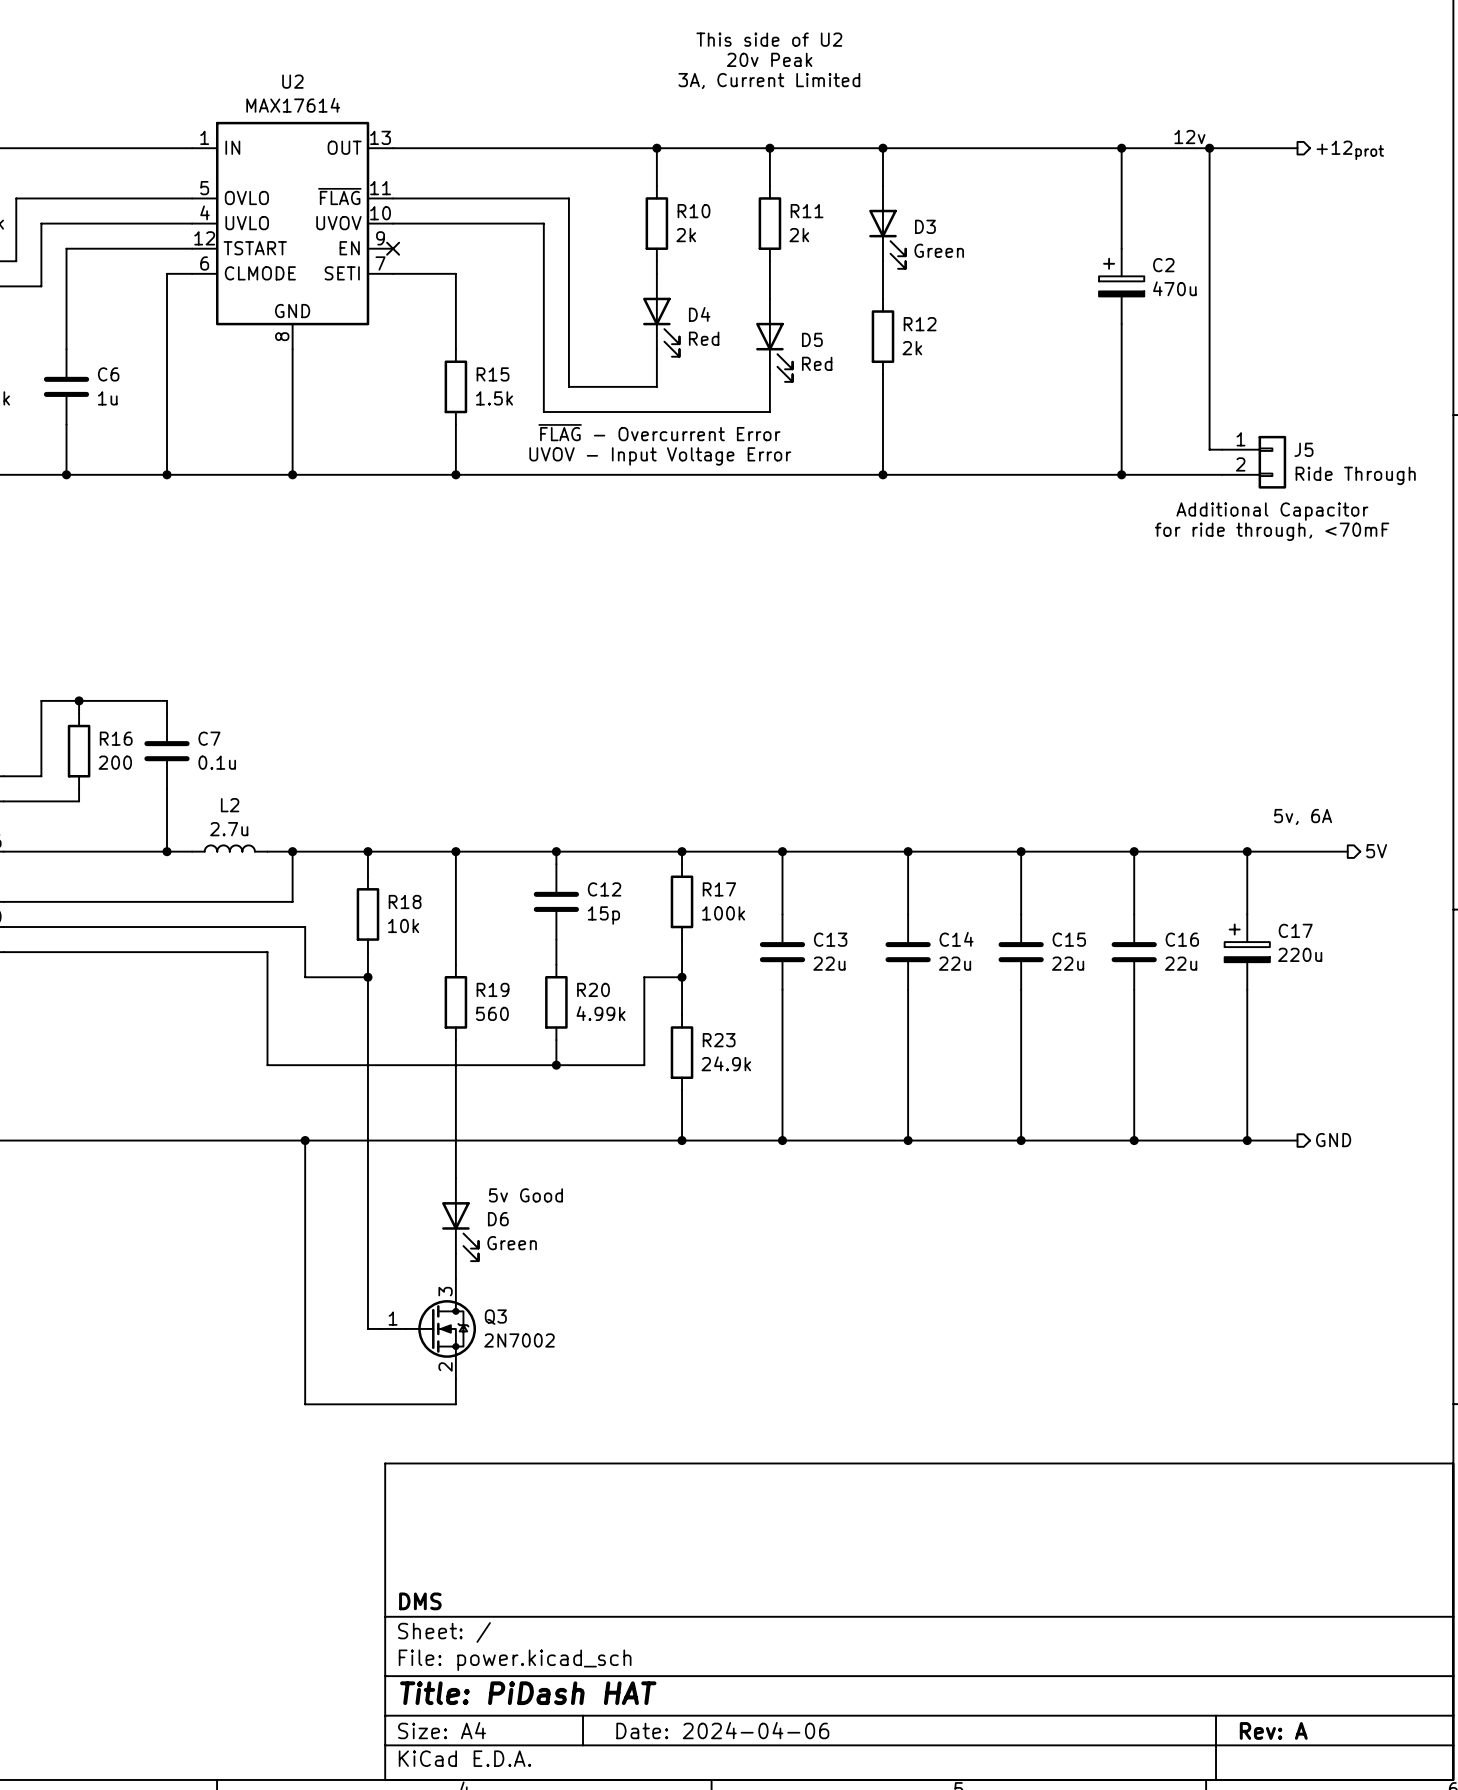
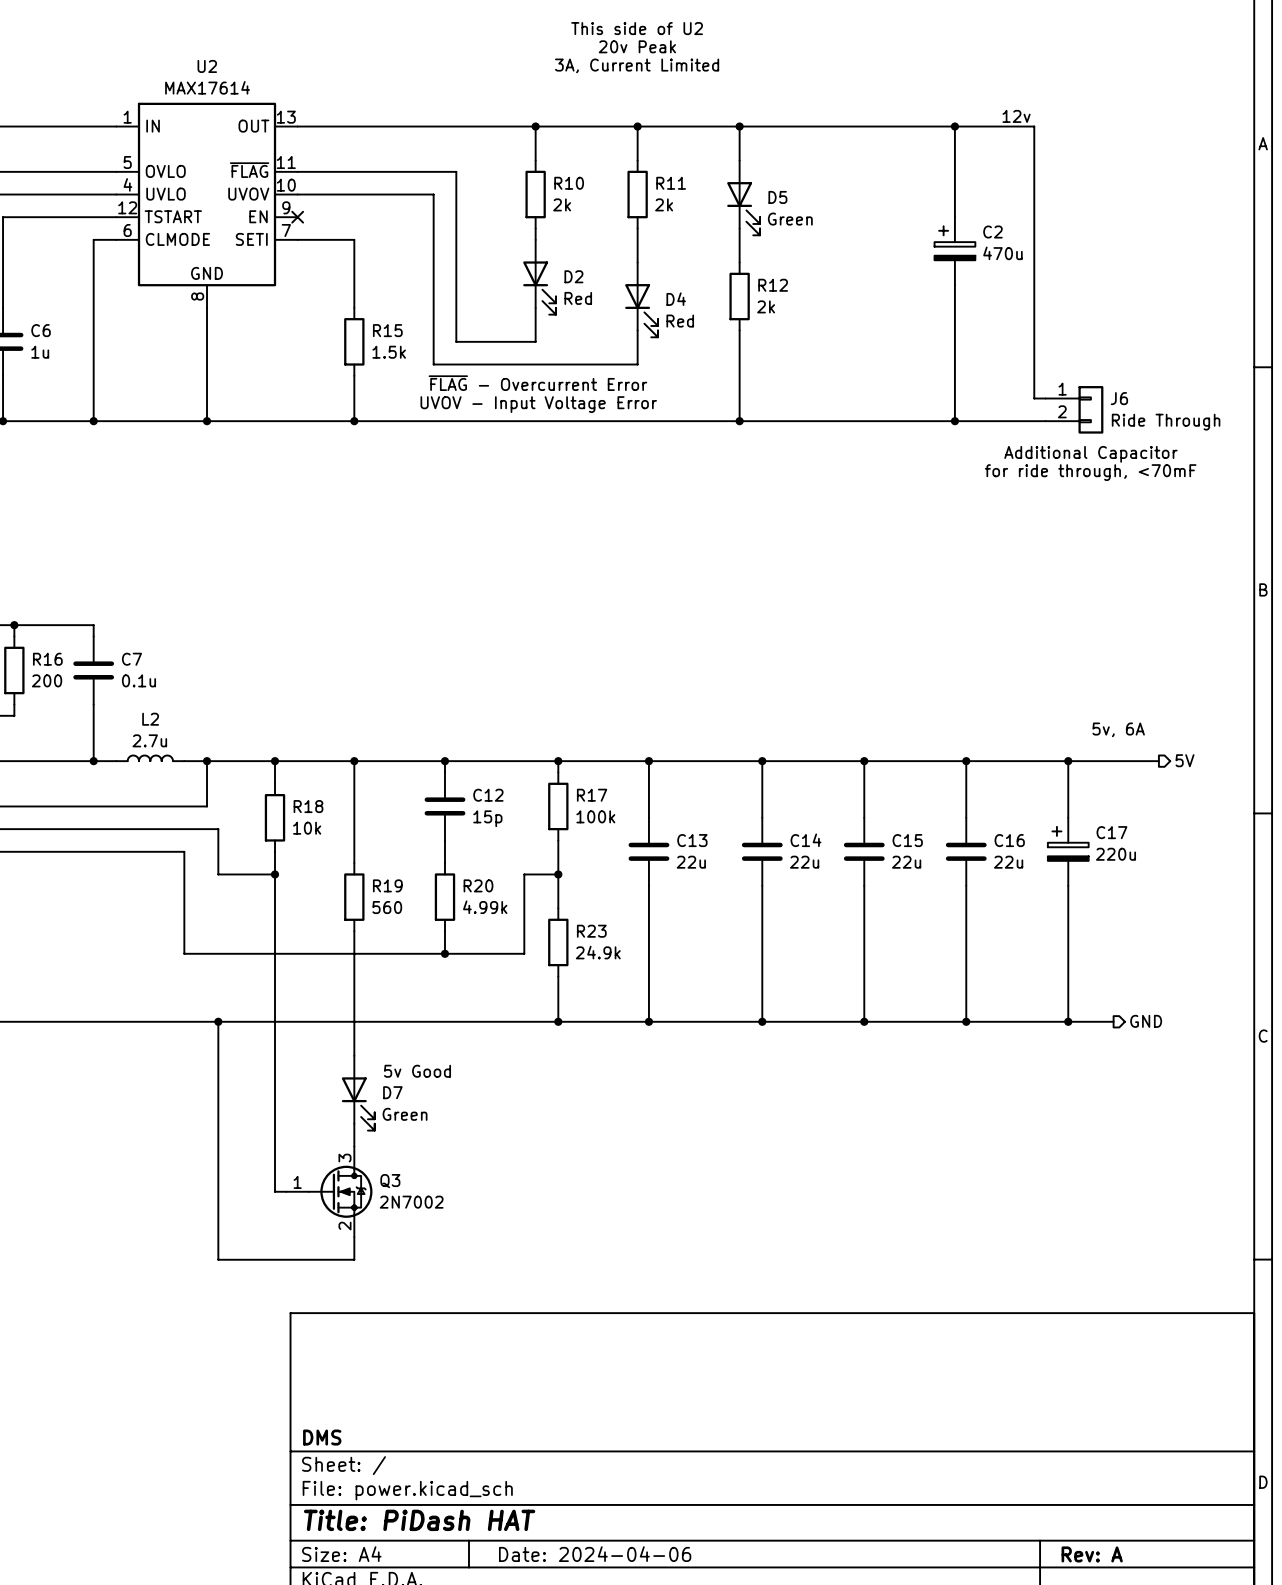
wire: (1209, 148) (1297, 148) -> none
junction: (1209, 148) -> none
hierarchical label: +12prot (1350, 150) -> none
D3 name: D3 (925, 226) -> D5 (777, 197)
D4 name: D4 (699, 314) -> D2 (573, 276)
D5 name: D5 (812, 339) -> D4 (676, 299)
J5 name: J5 (1303, 449) -> J6 (1119, 398)
D6 name: D6 (498, 1219) -> D7 (392, 1092)

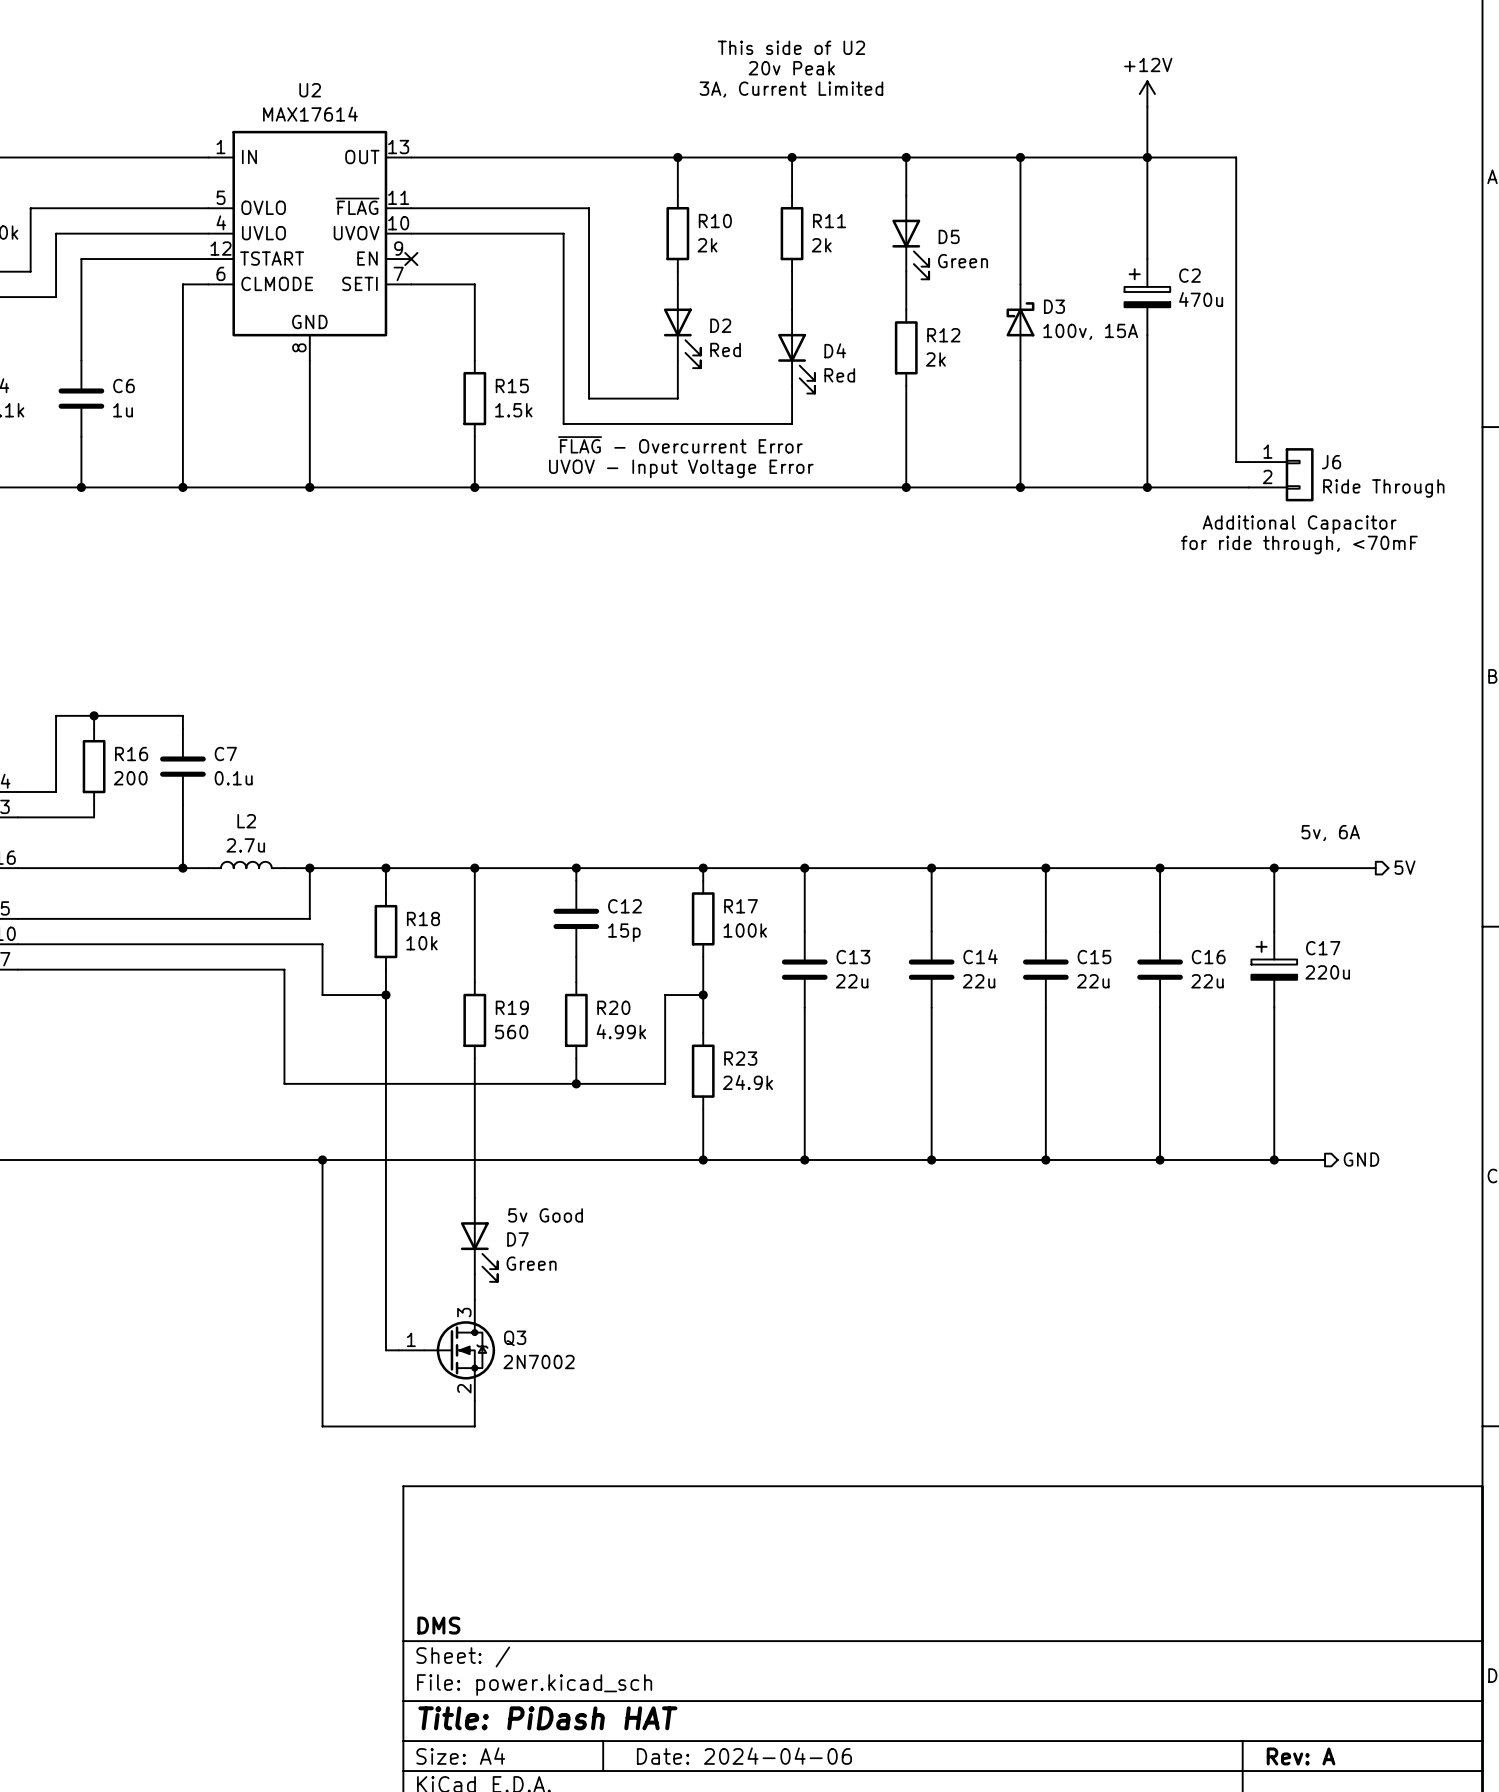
power symbol: none -> +12V (1147, 94)
wire: none -> (1147, 106) (1147, 157)
label: 12v (1016, 116) -> none
wire: none -> (1020, 157) (1020, 284)
junction: none -> (1020, 157)
D3: none -> 100v, 15A (1020, 322)
wire: none -> (1020, 360) (1020, 487)
junction: none -> (1020, 487)

